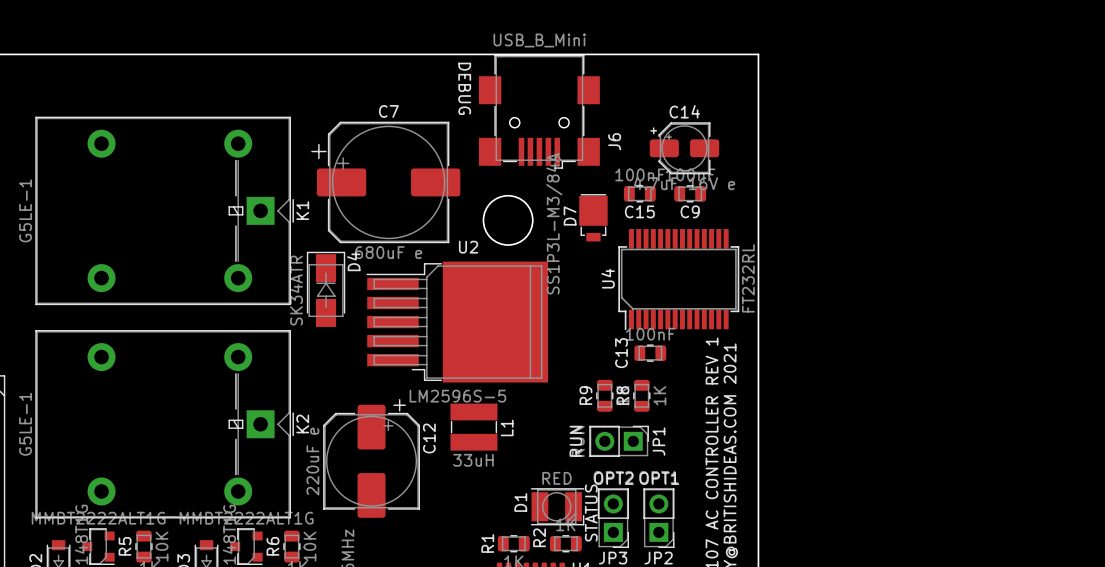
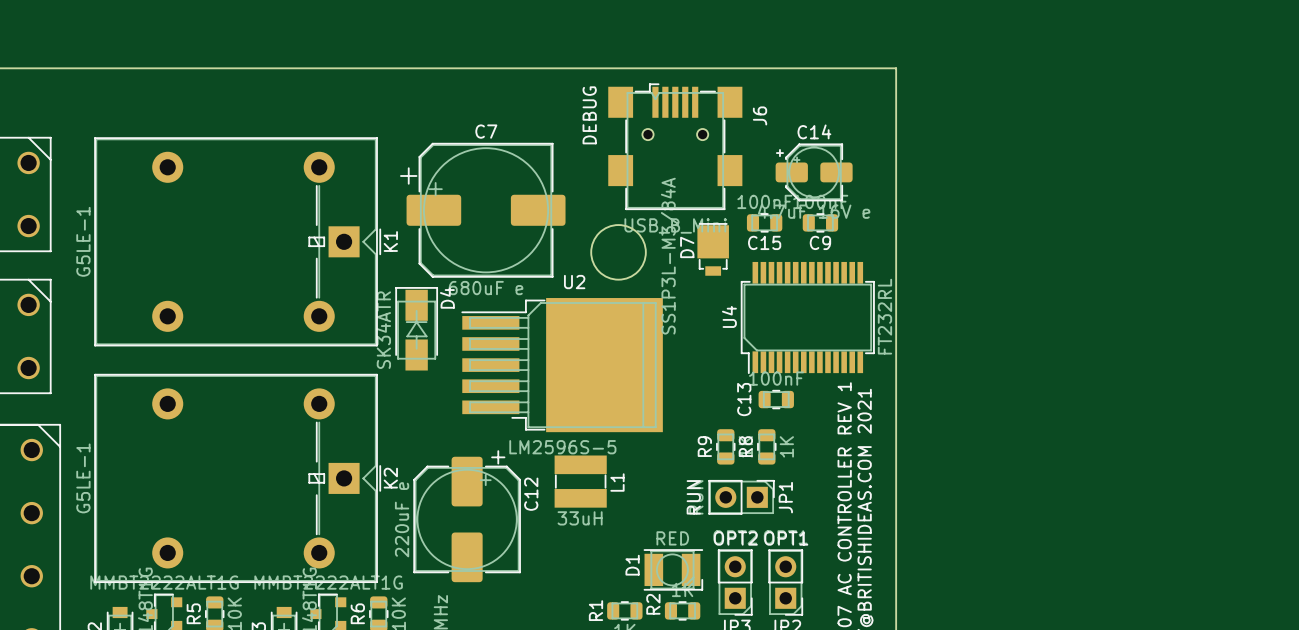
text rotation: 0° (464, 88) -> 180° (589, 115)
J6 rotation: 0° (539, 111) -> 180° (675, 146)
J6 name position: J6 (614, 141) -> J6 (760, 115)
text: STATUS (591, 513) -> none

